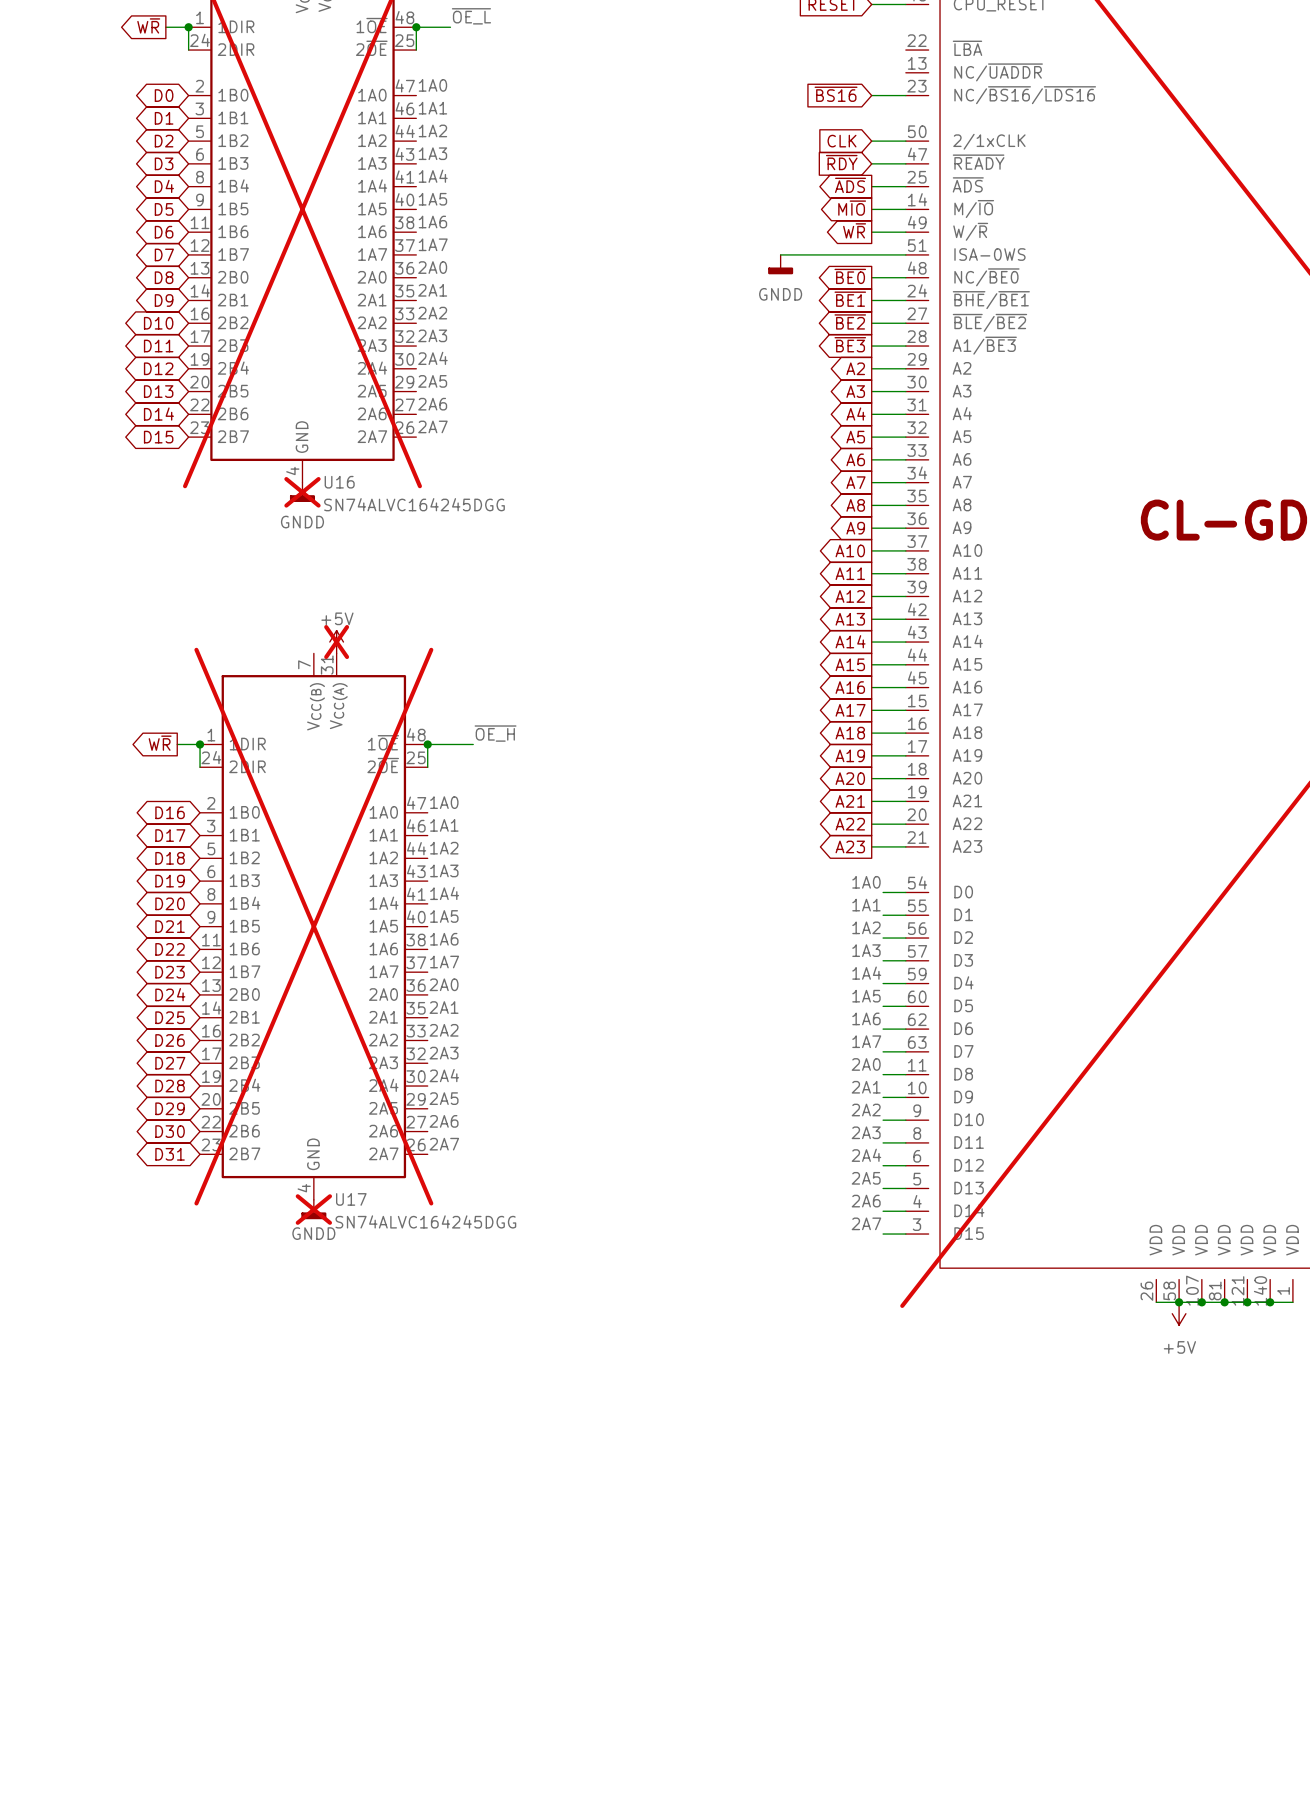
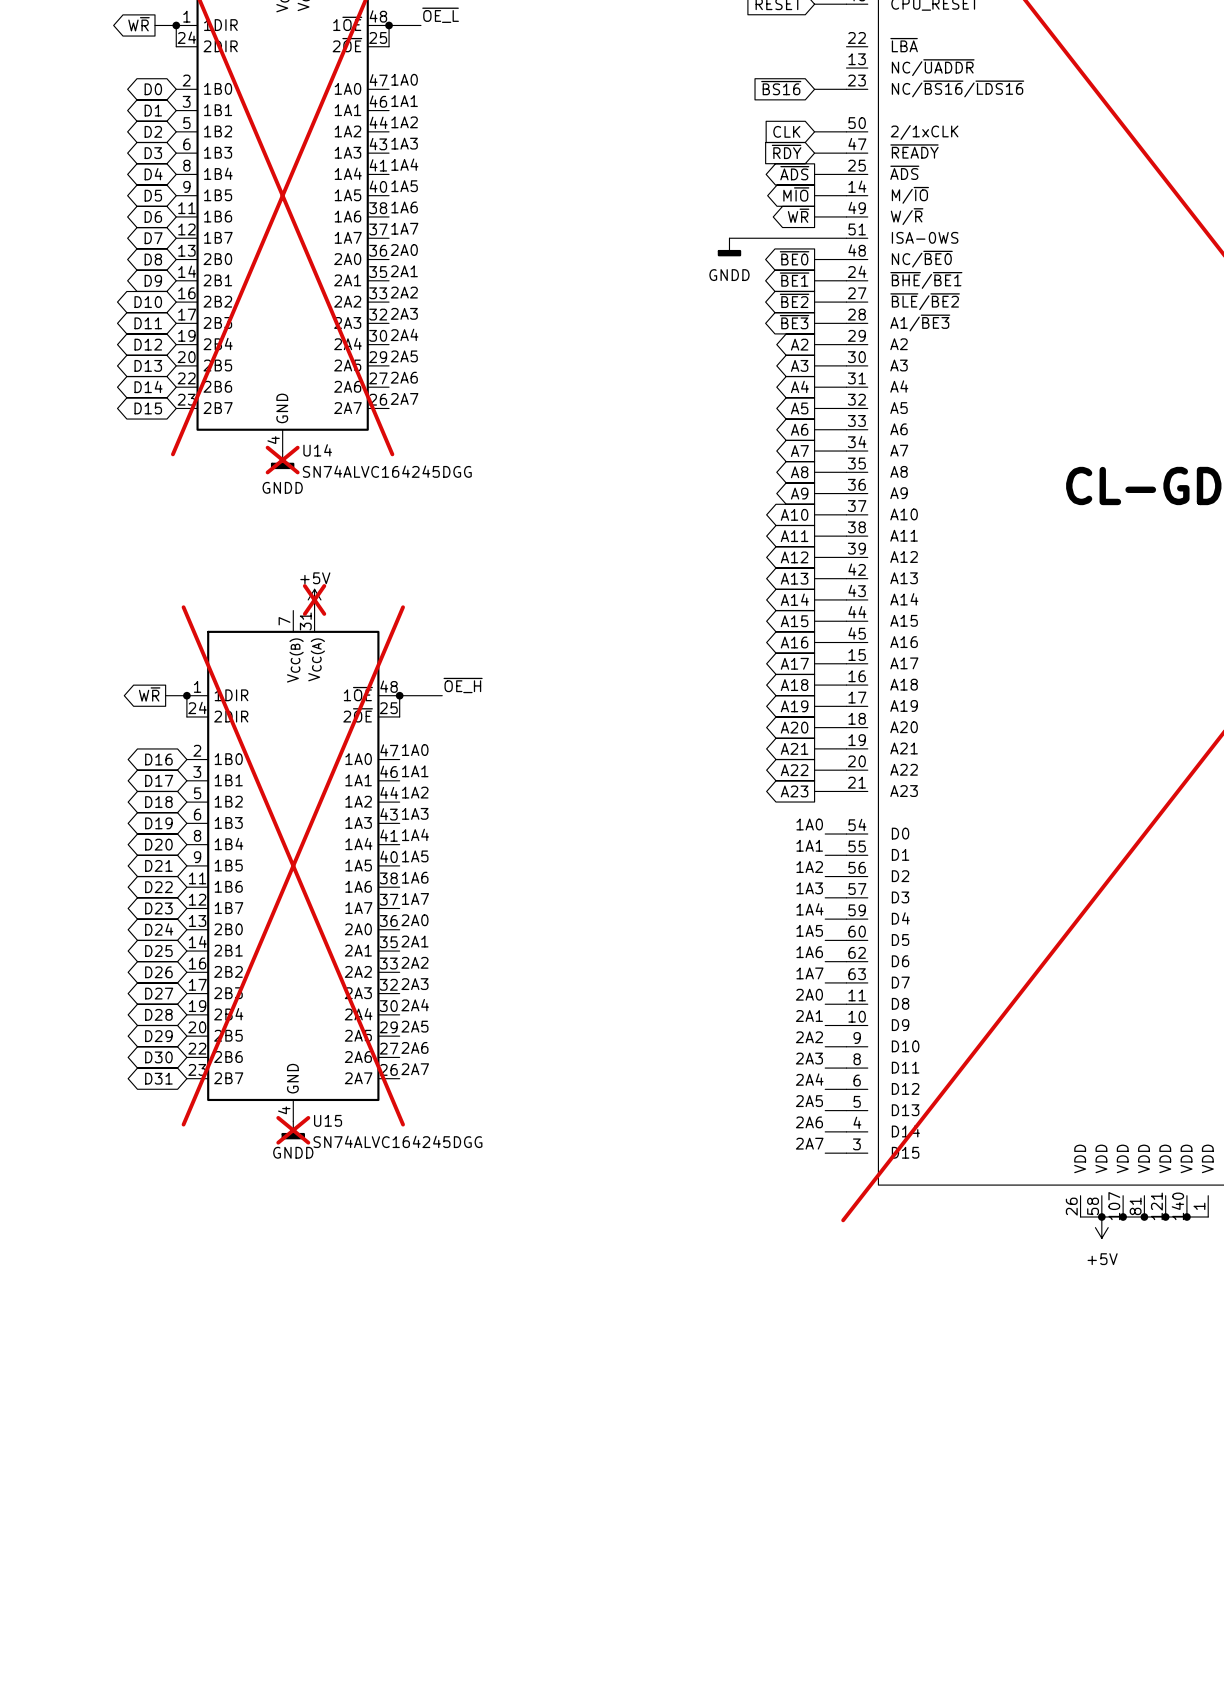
U16 name: U16 (339, 482) -> U14 (317, 450)
U17 name: U17 (351, 1199) -> U15 (328, 1120)

